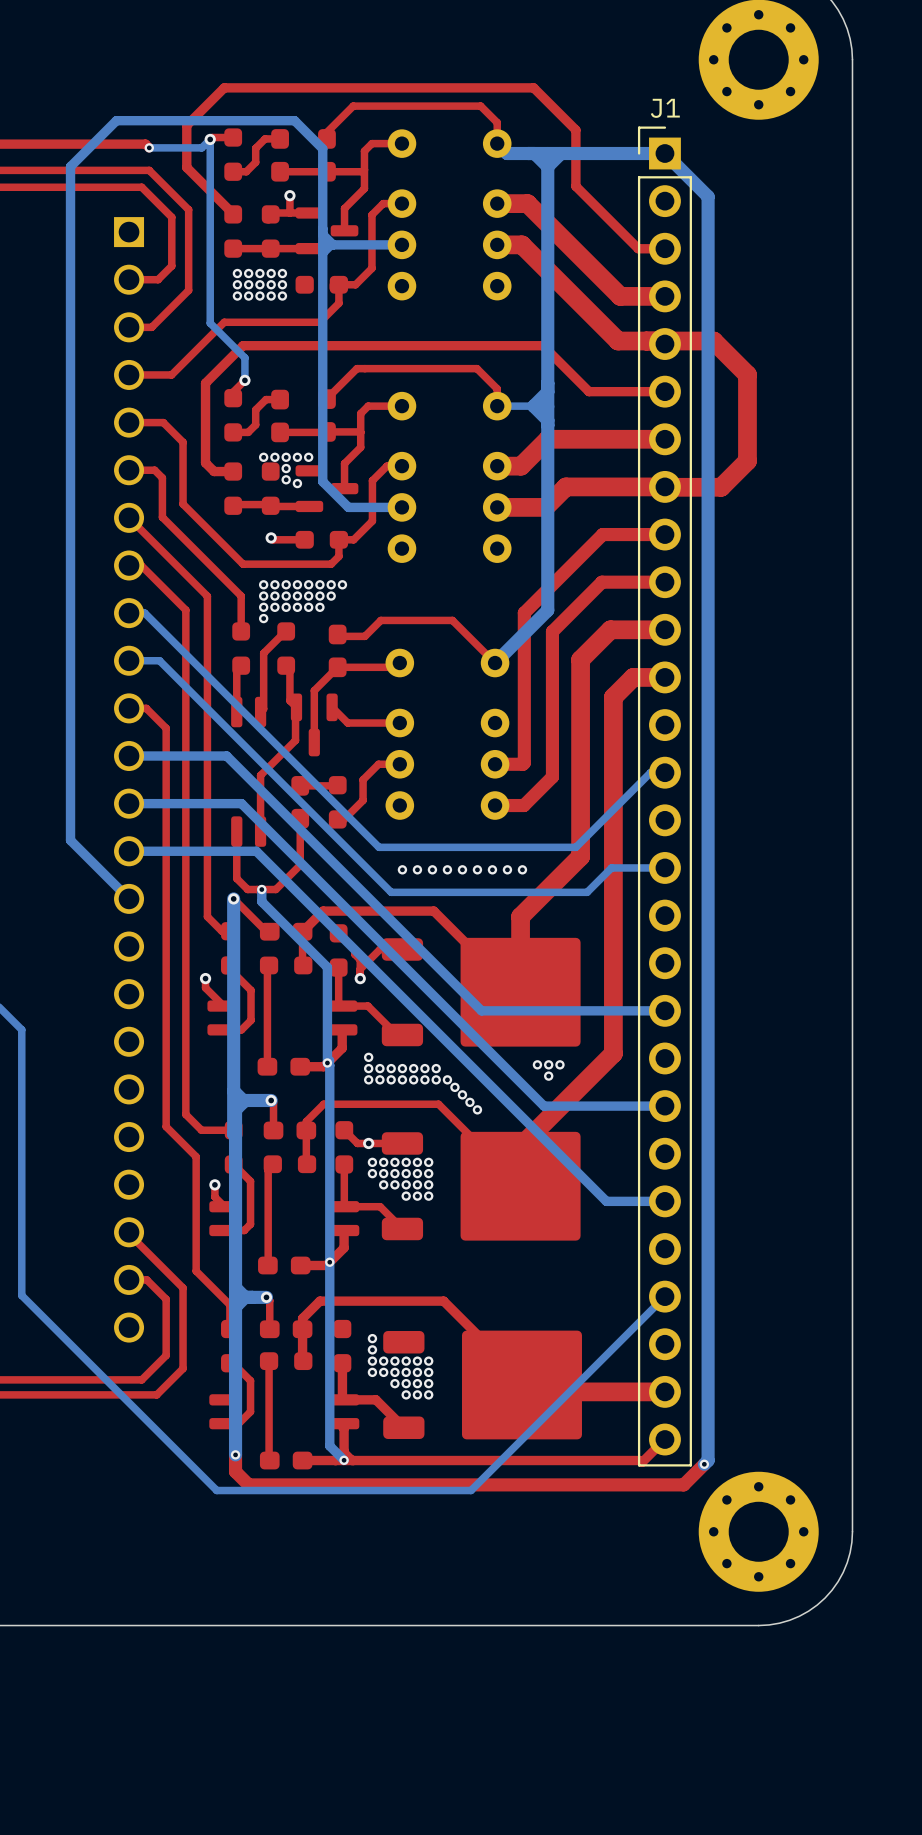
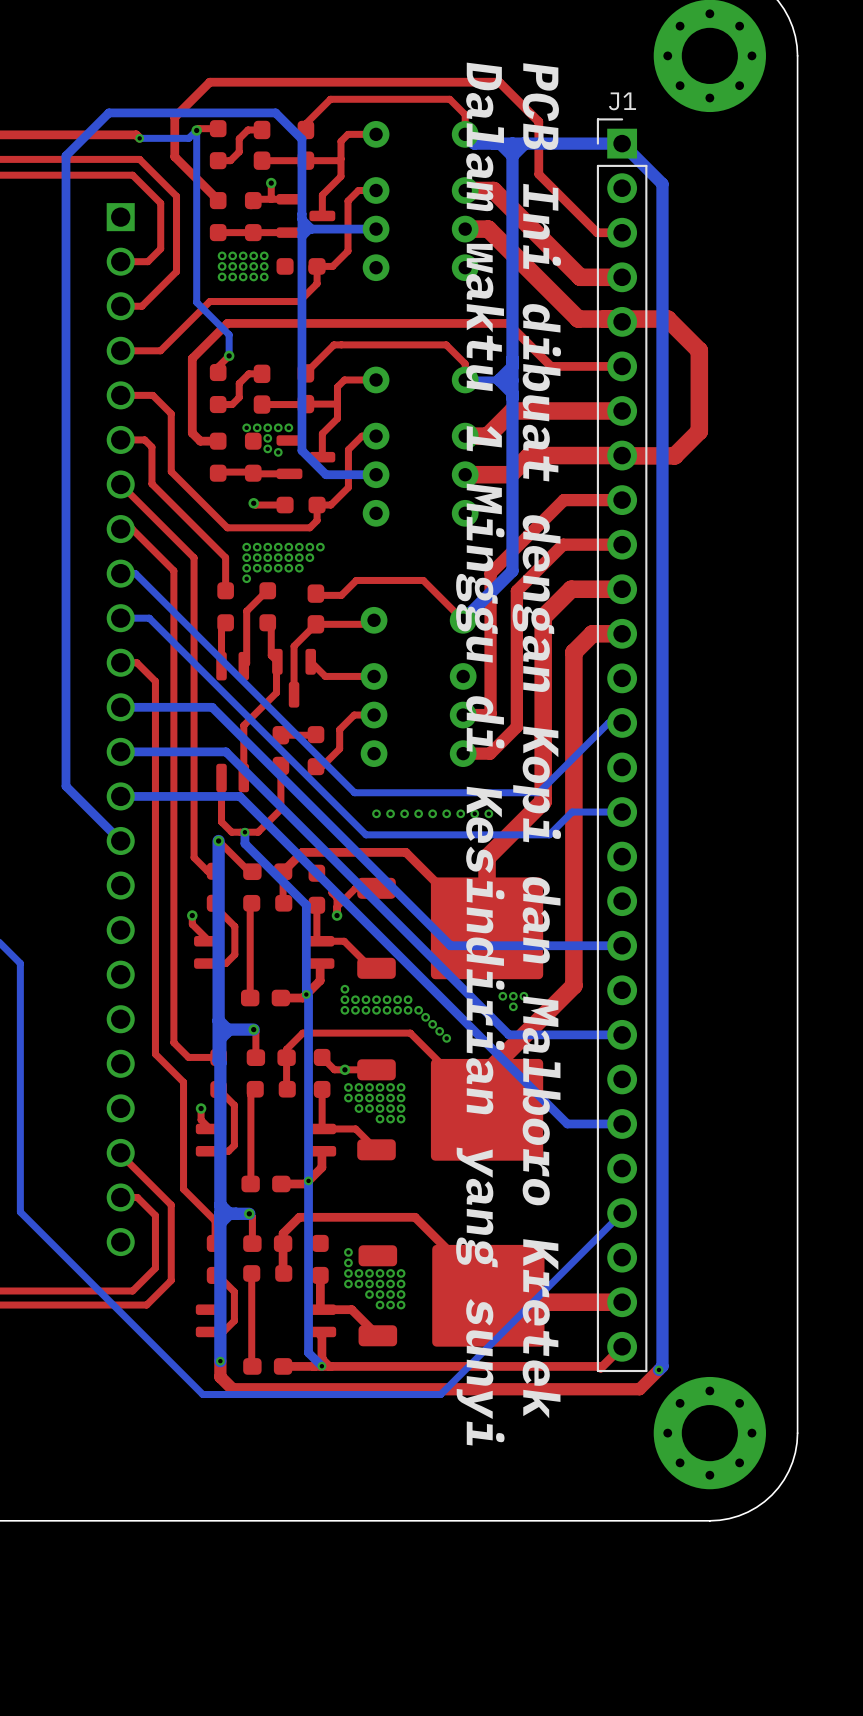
text: none -> PCB Ini dibuat dengan Kopi dan Malboro Kretek (536, 740)
text: none -> Dalam waktu 1 Minggu di Kesindirian yang sunyi (480, 754)

